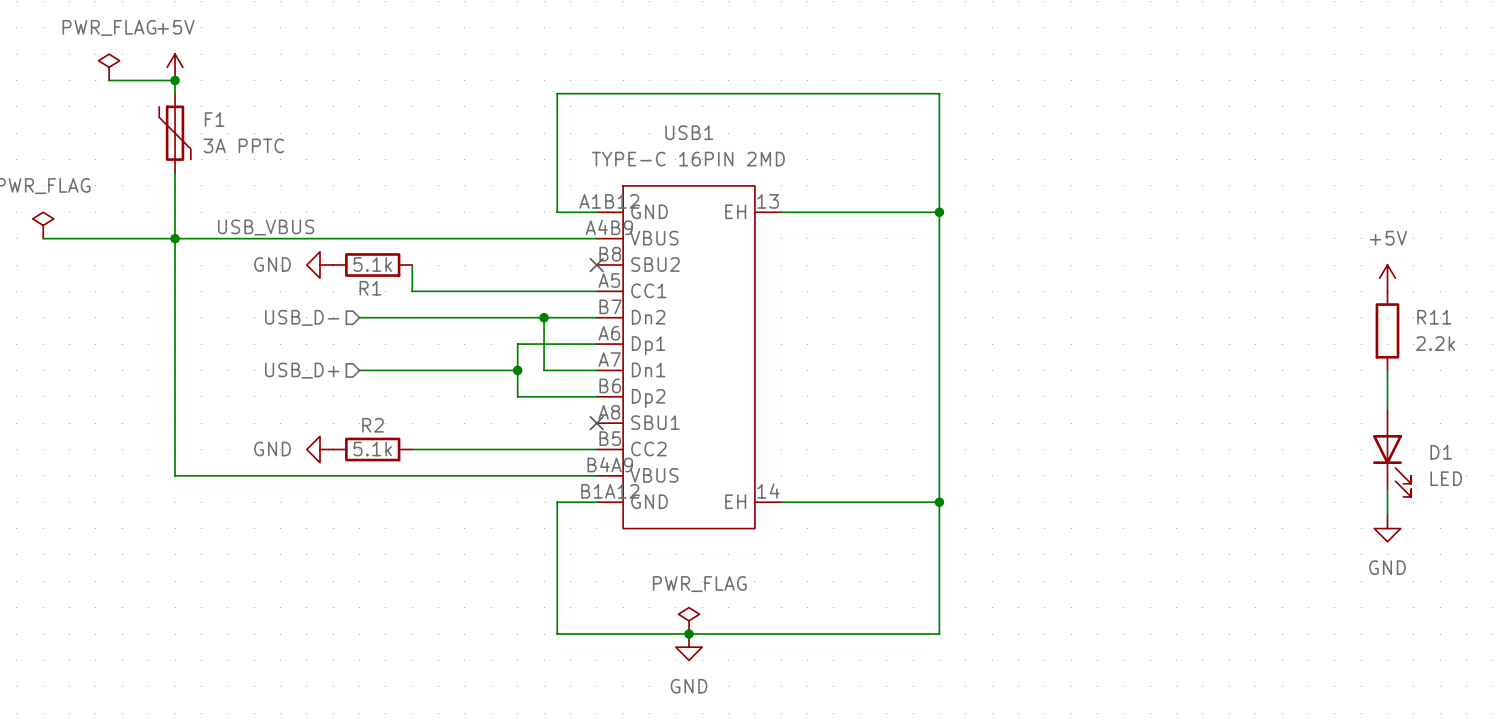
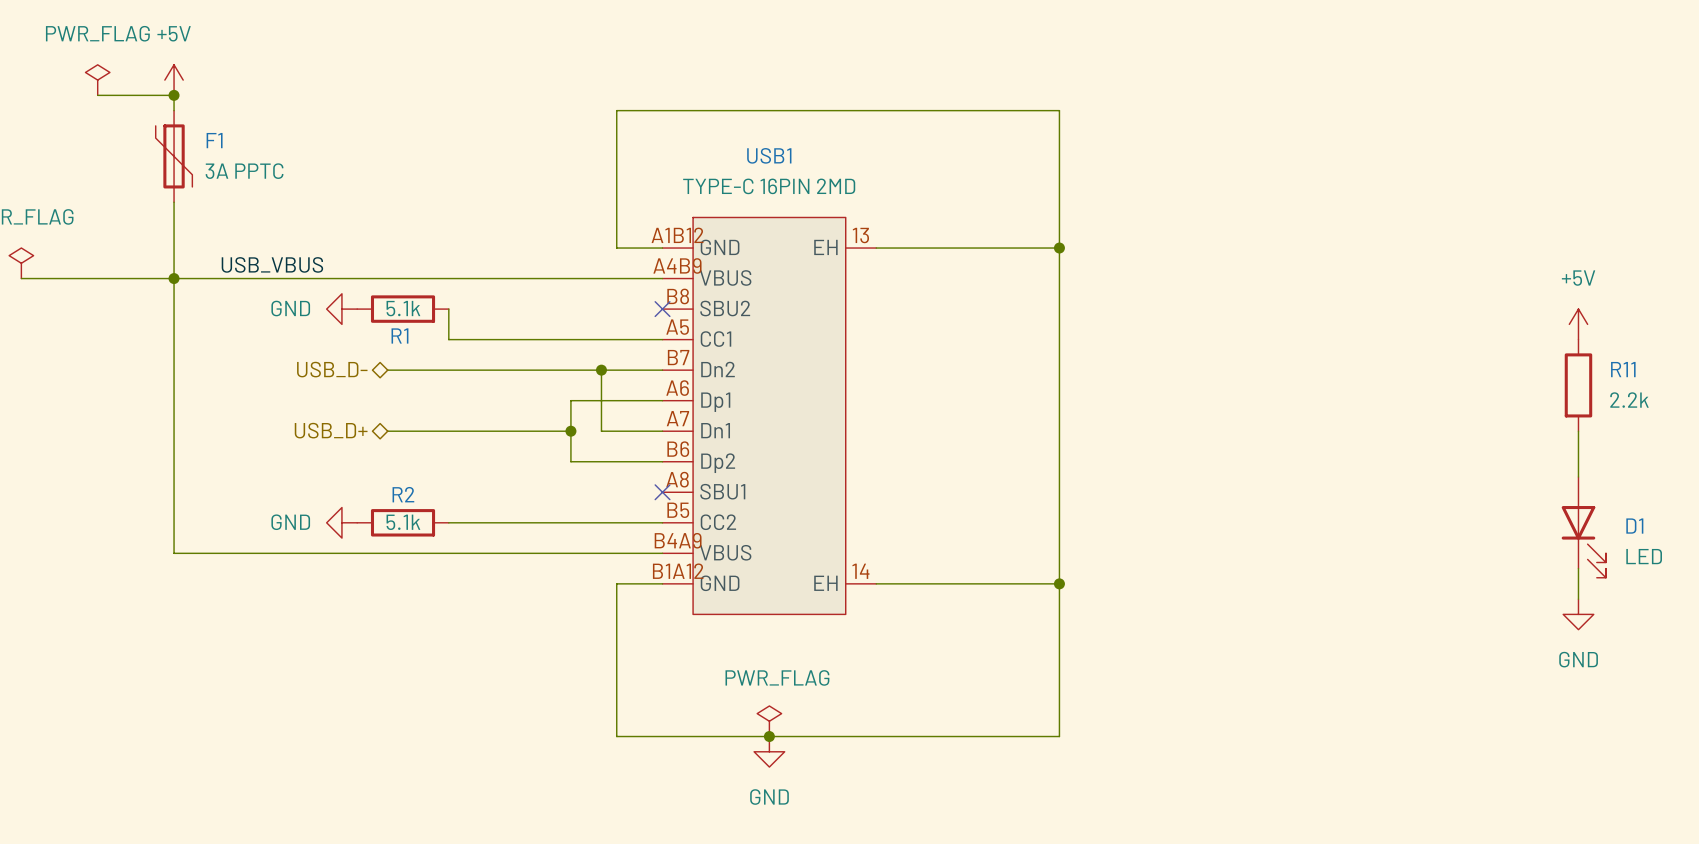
hierarchical label shape: input (302, 317) -> bidirectional (332, 369)
hierarchical label shape: input (302, 370) -> bidirectional (331, 430)

